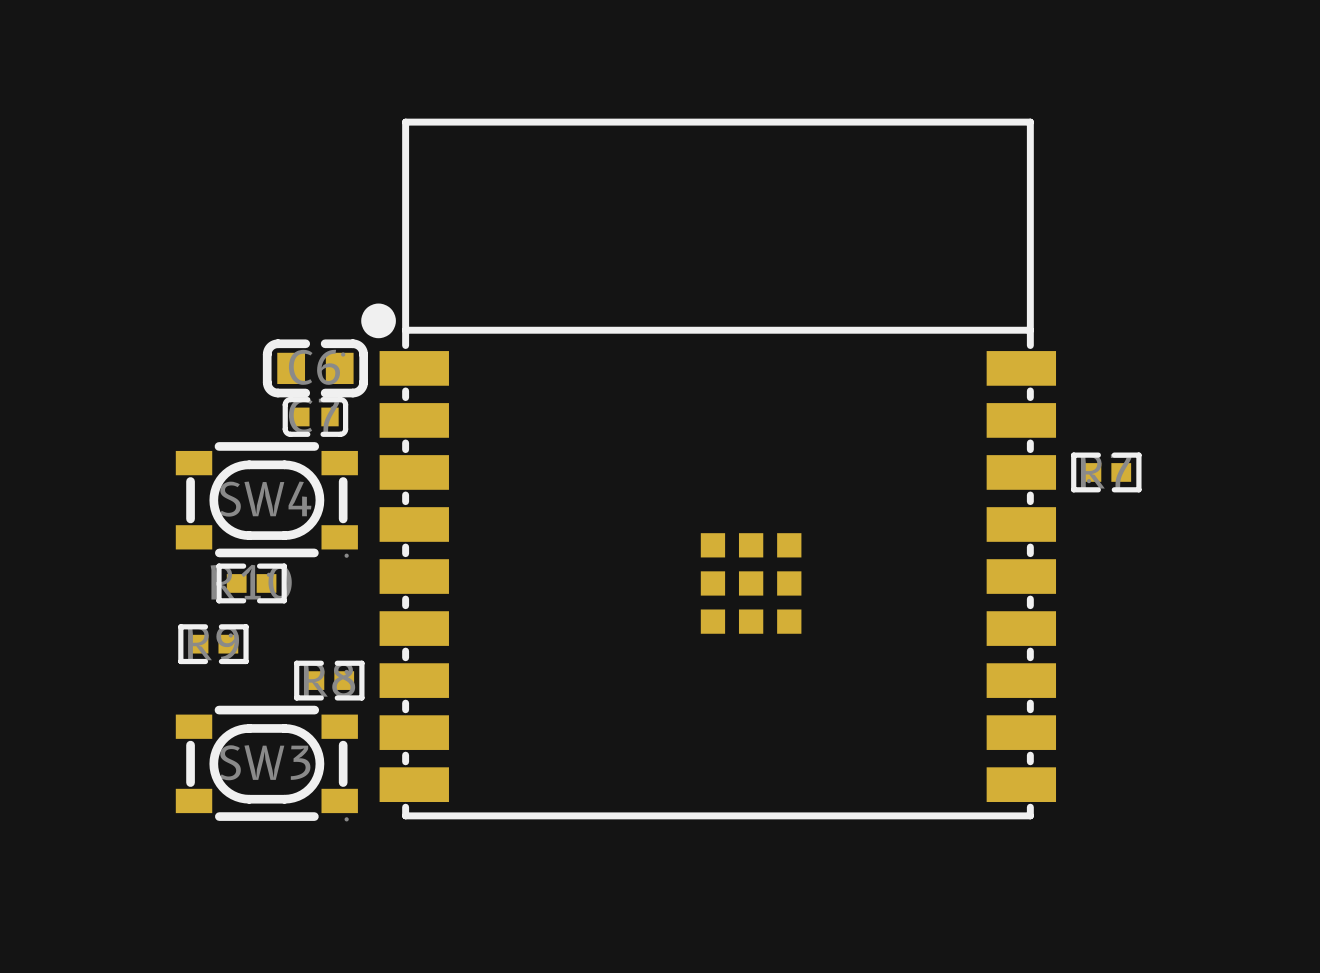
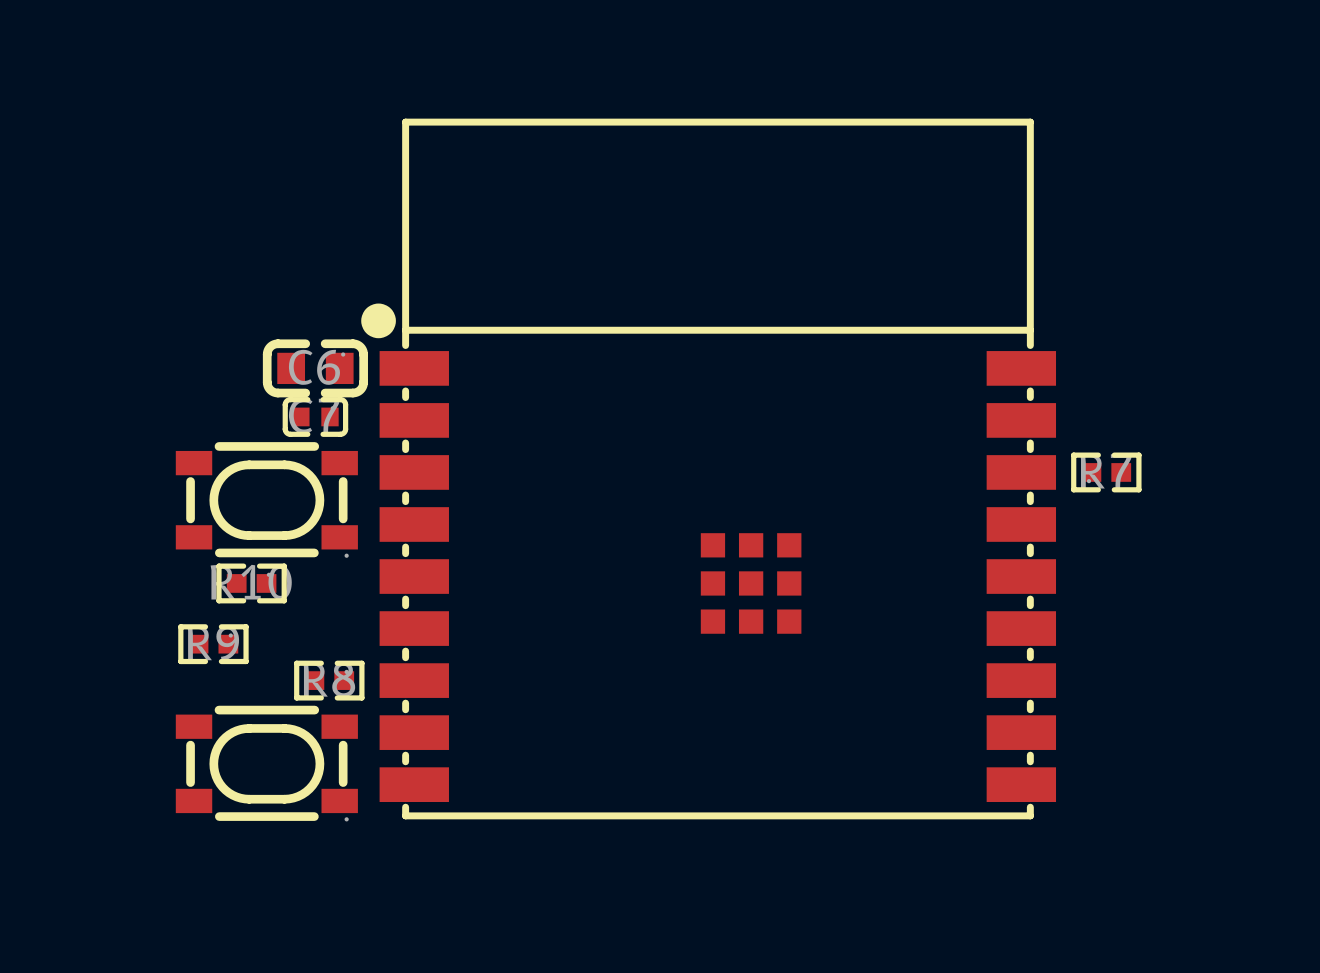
SW4 name: SW4 (265, 499) -> none
SW3 name: SW3 (265, 762) -> none

